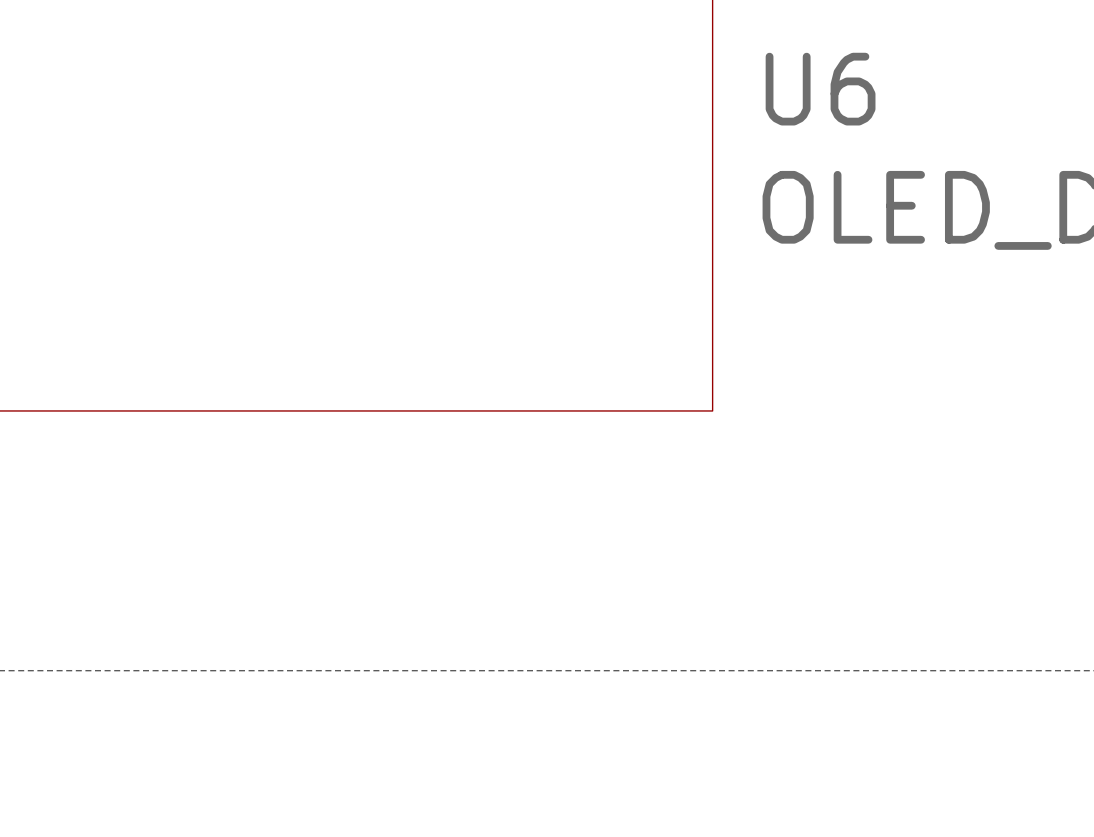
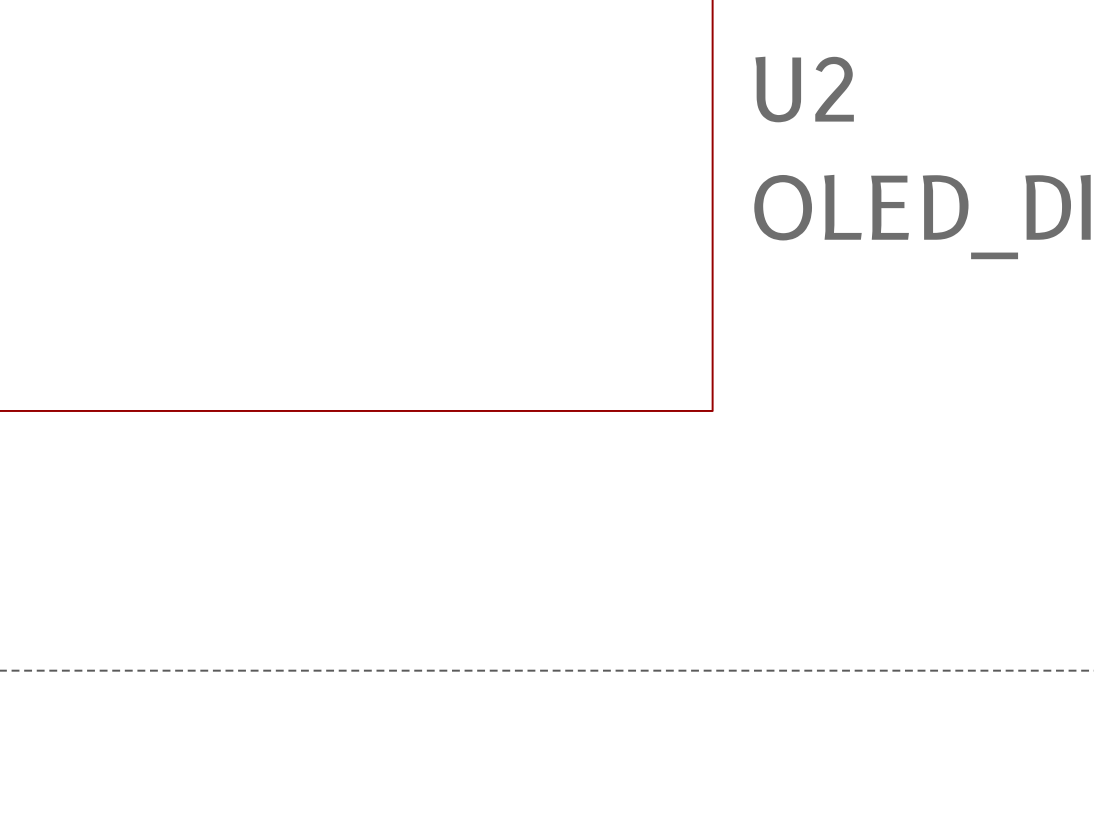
U6 name: U6 (820, 89) -> U2 (804, 89)

